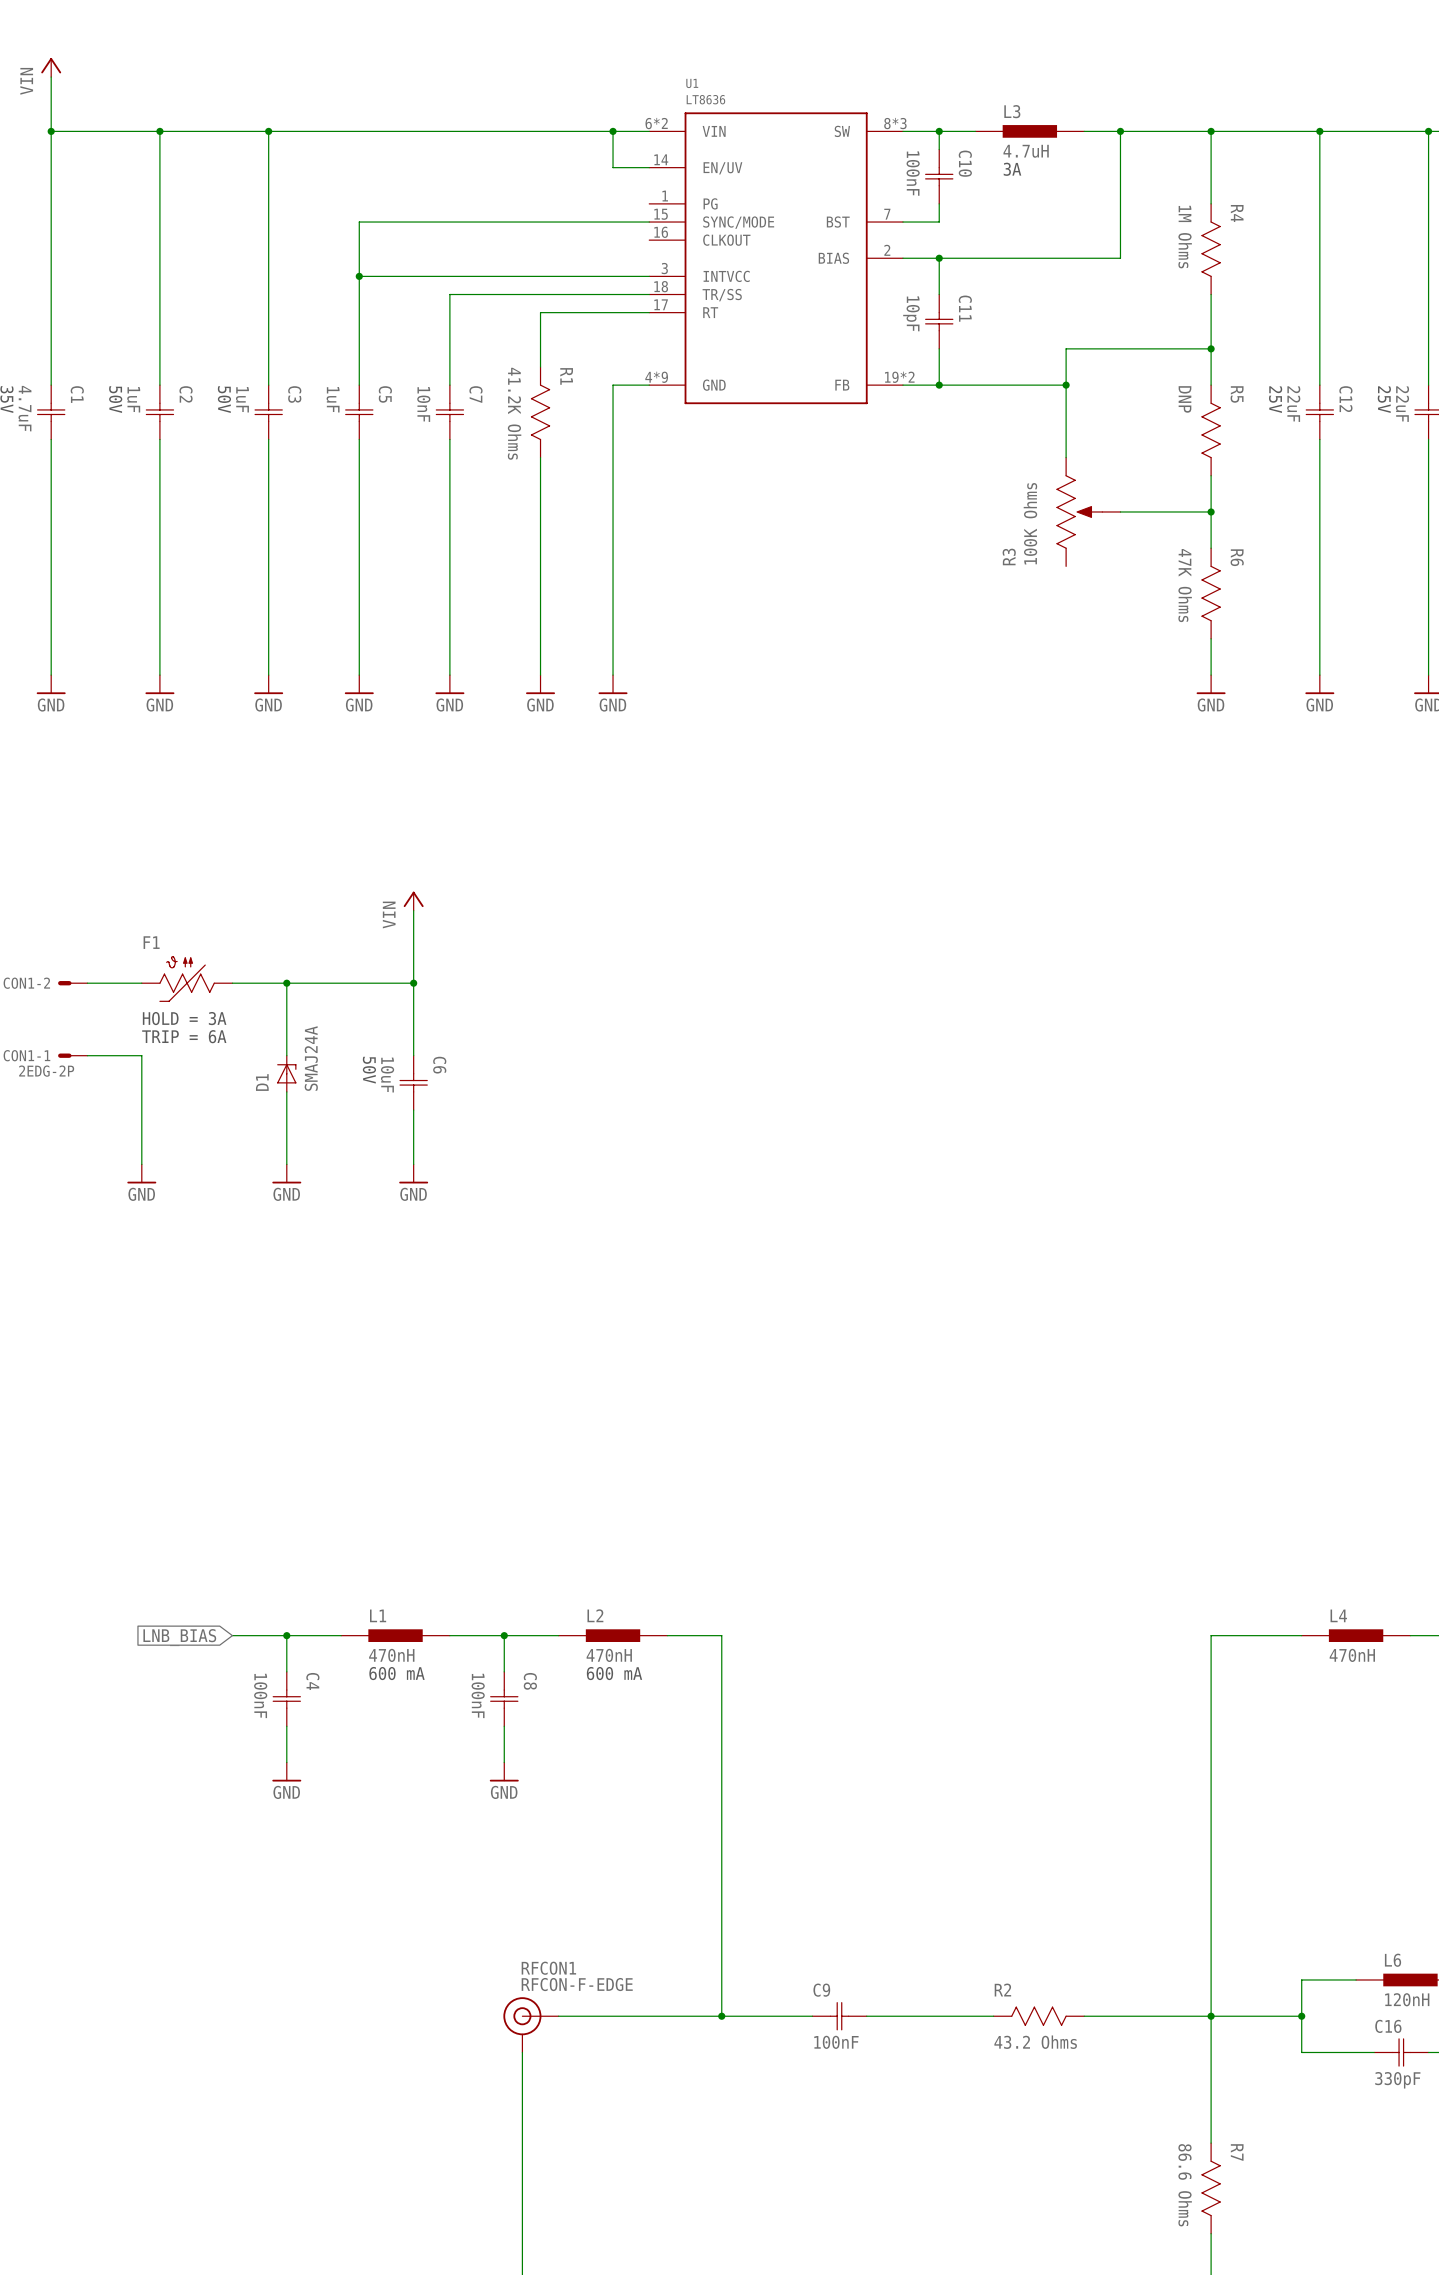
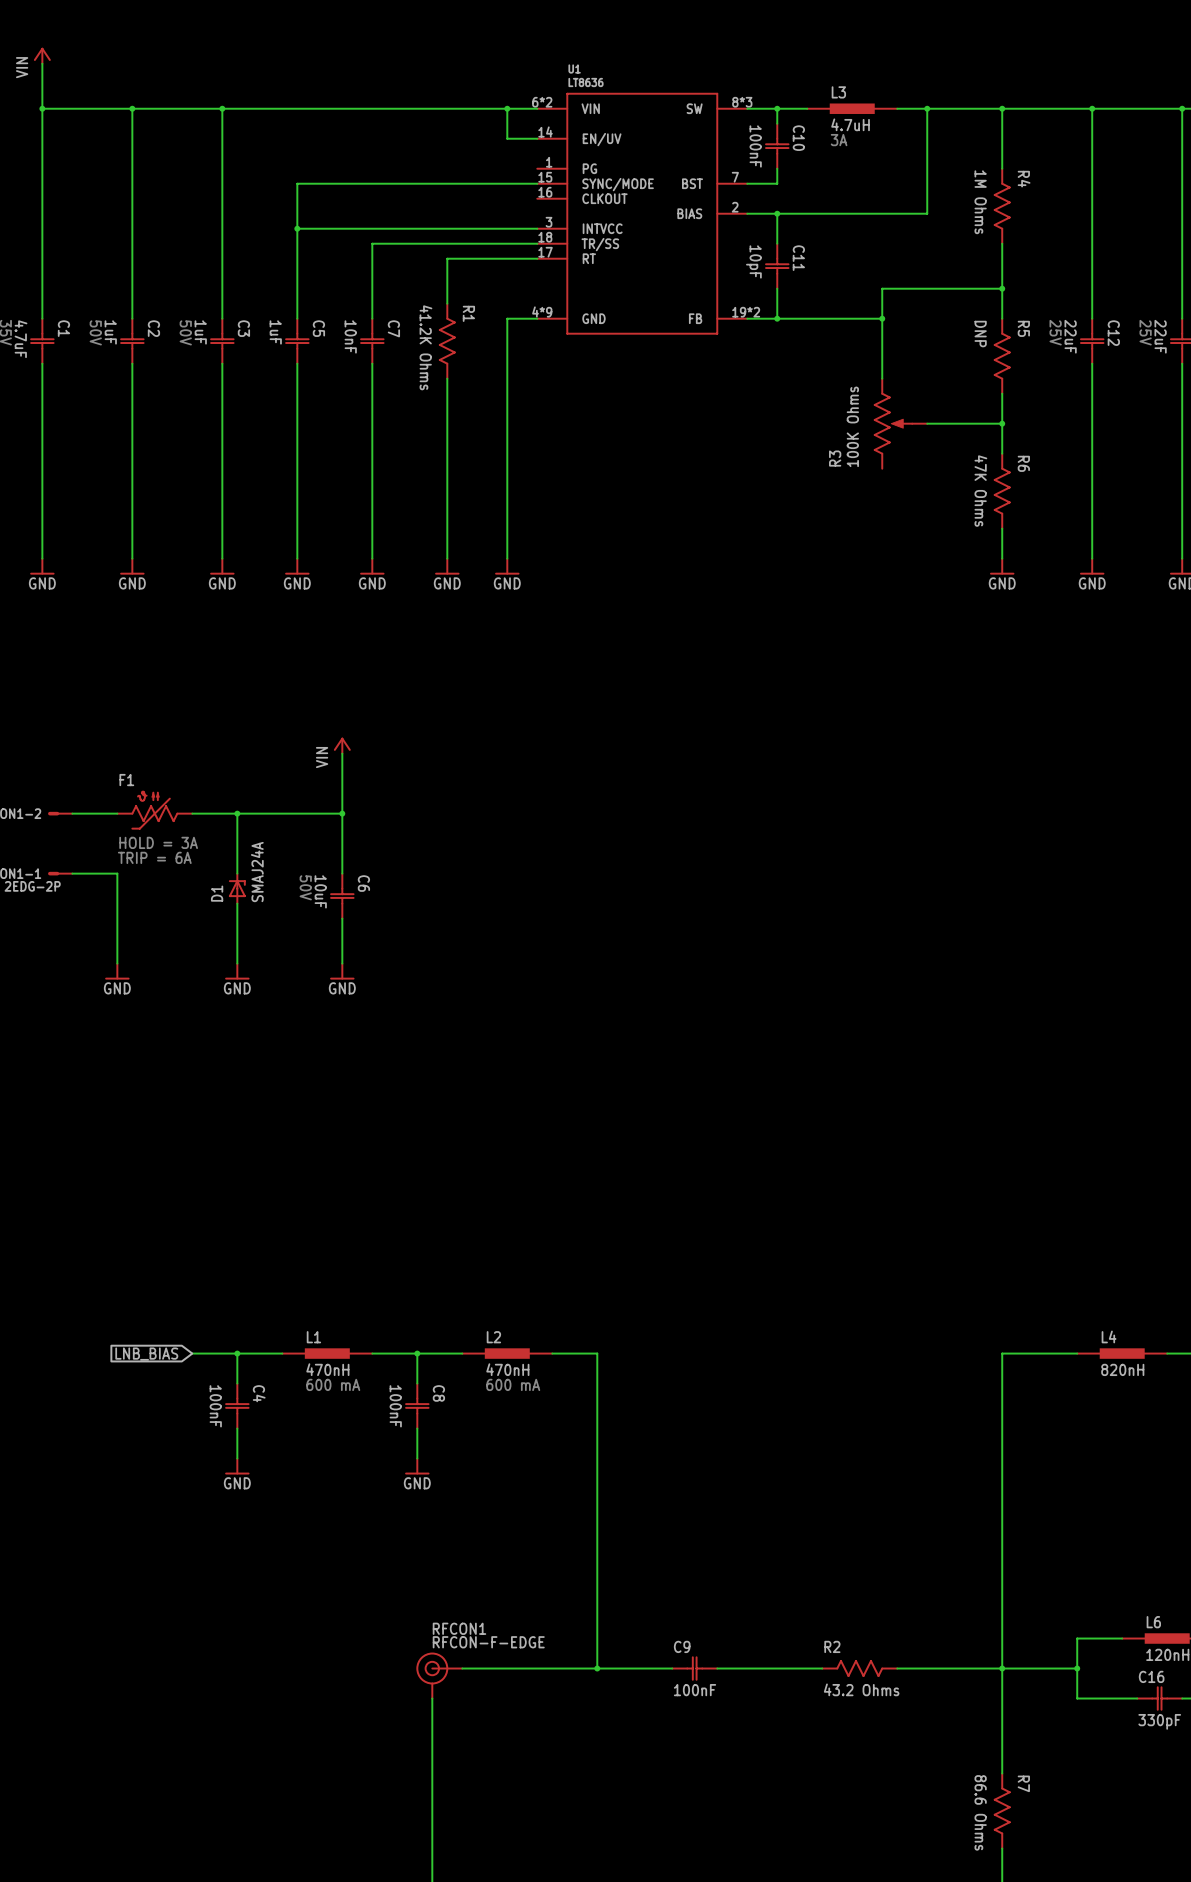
L4 value: 470nH (1352, 1655) -> 820nH (1122, 1369)

